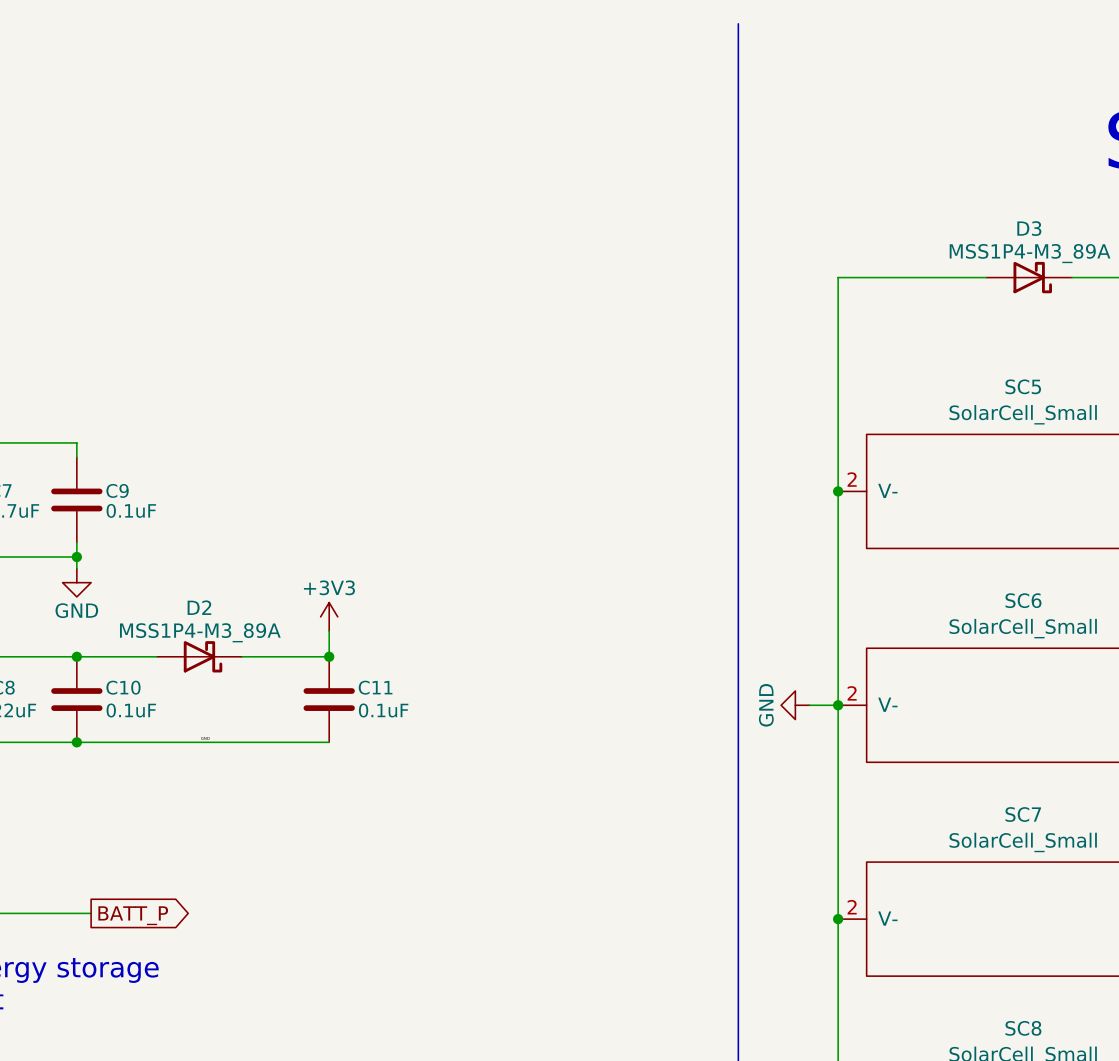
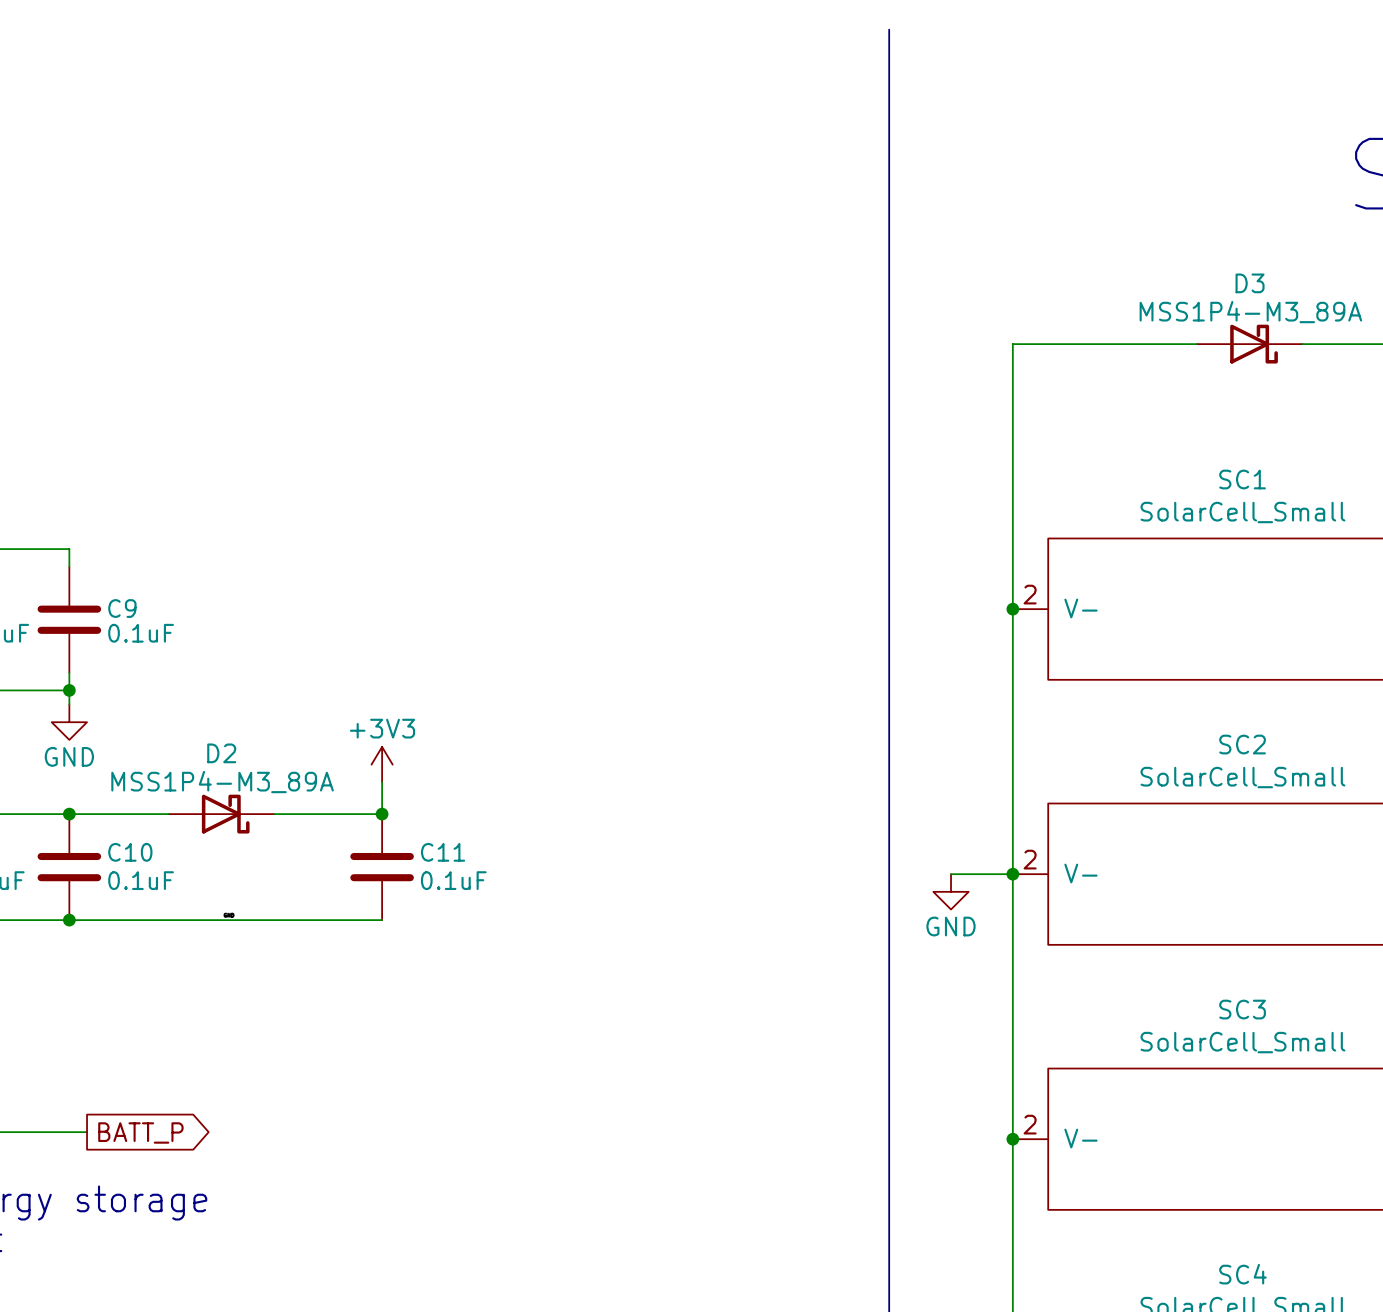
SC5 name: SC5 (1023, 386) -> SC1 (1242, 479)
SC6 name: SC6 (1023, 600) -> SC2 (1242, 744)
power symbol rotation: 0° (795, 705) -> 90° counterclockwise (951, 891)
SC7 name: SC7 (1023, 814) -> SC3 (1242, 1009)
SC8 name: SC8 (1023, 1028) -> SC4 (1242, 1274)

